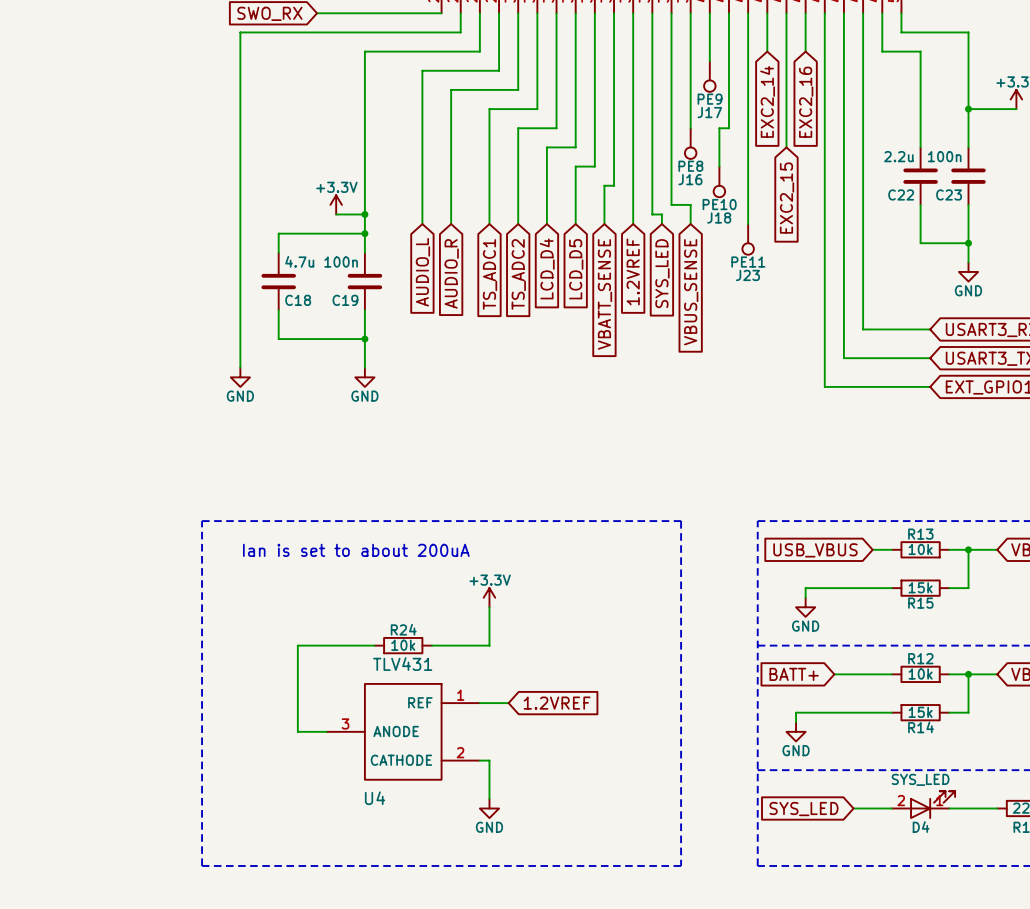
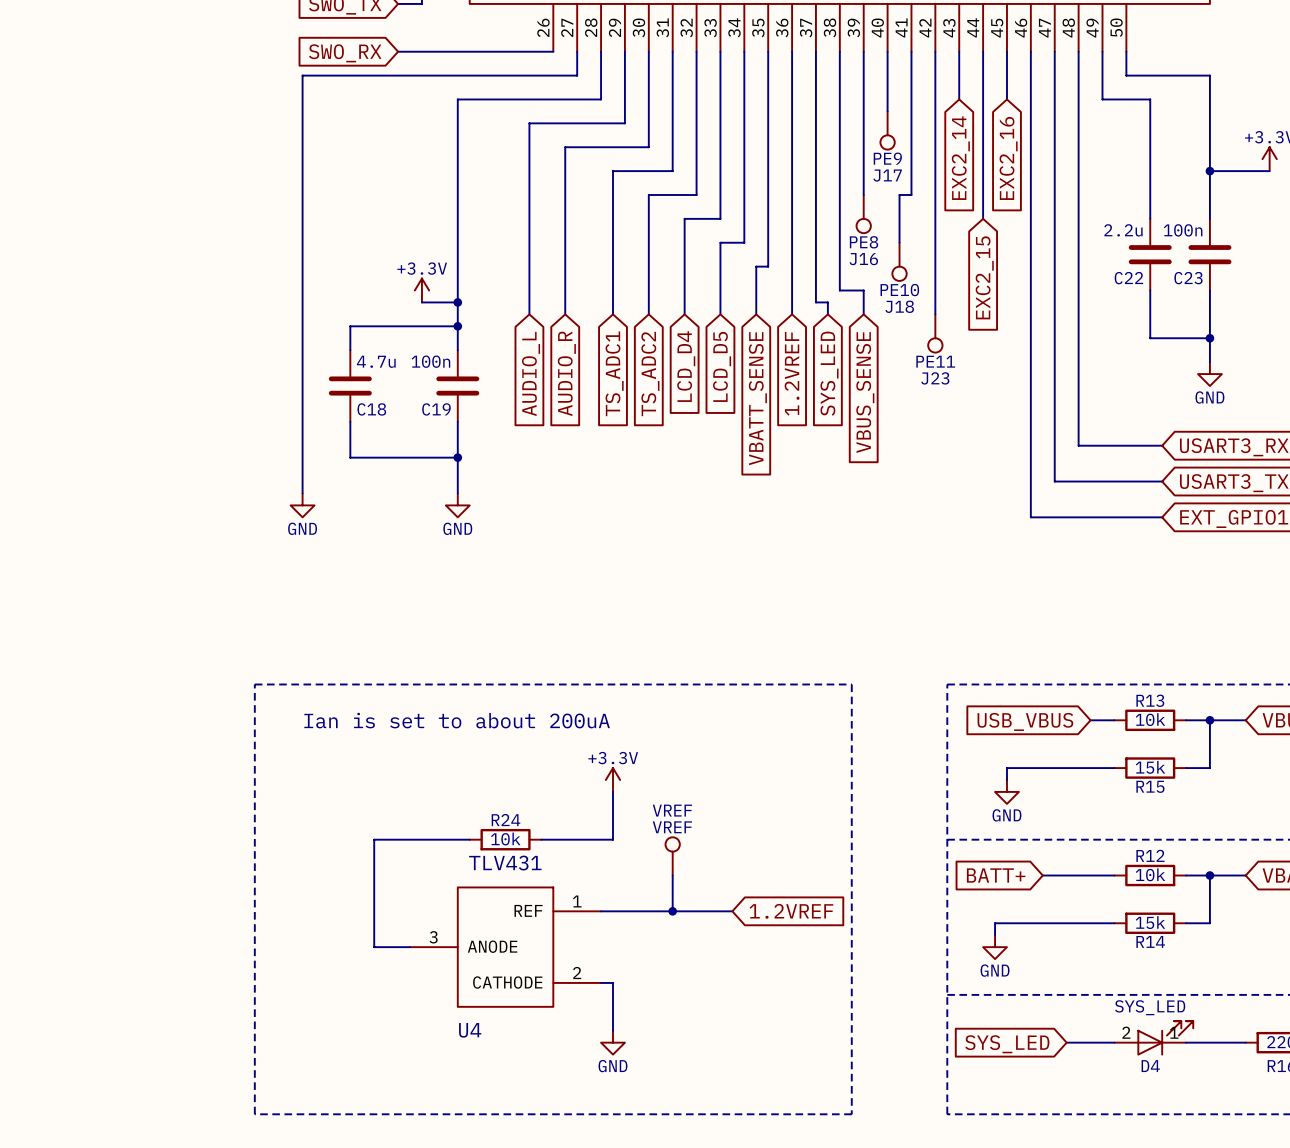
VREF: none -> VREF (672, 856)
wire: none -> (672, 875) (672, 911)
wire: none -> (636, 911) (732, 911)
junction: none -> (672, 911)
global label position: 1.2VREF (557, 703) -> 1.2VREF (791, 911)

